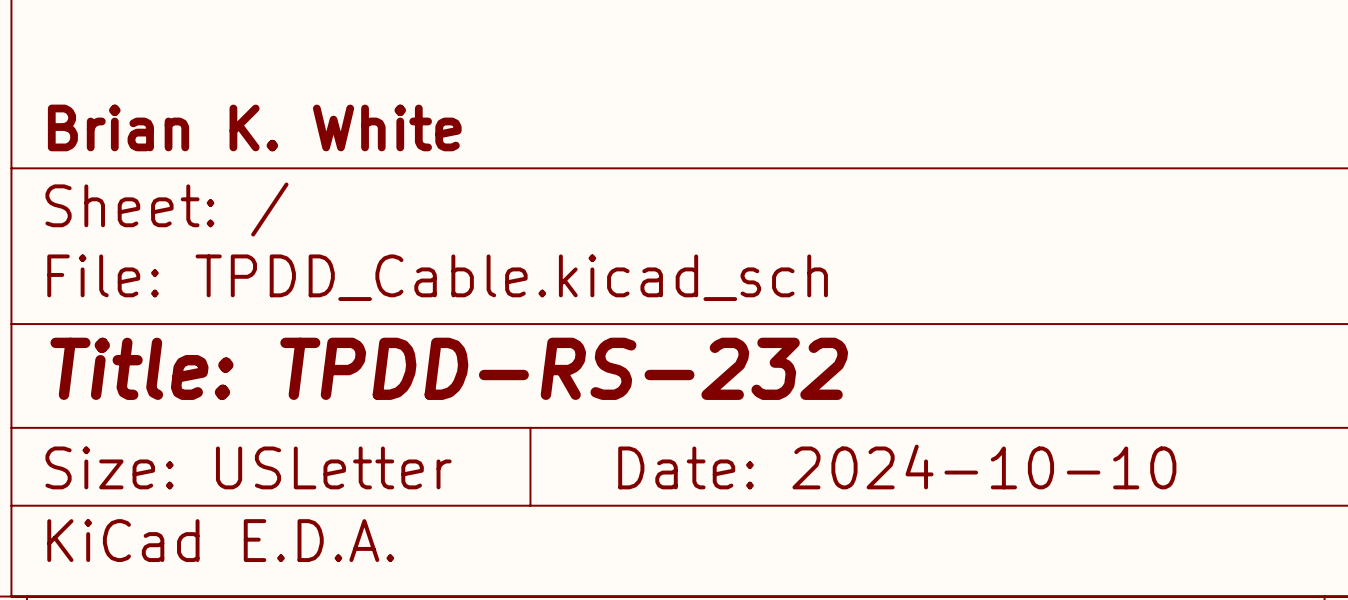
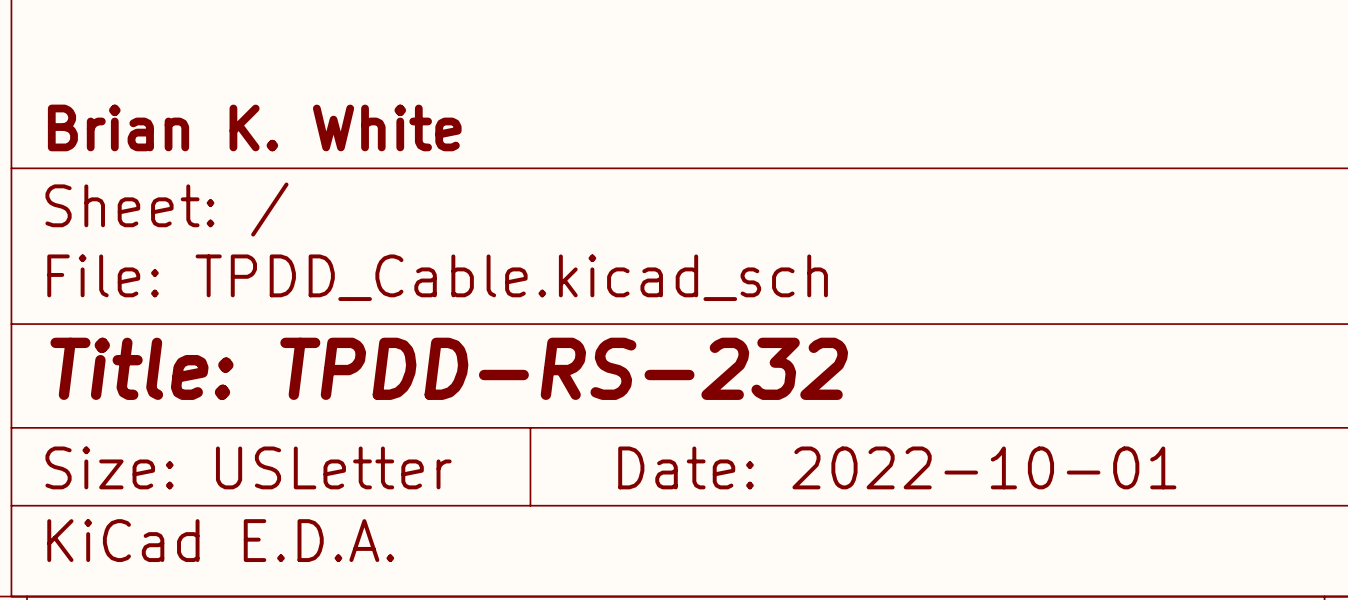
title block: Date: 2024-10-10 (897, 466) -> Date: 2022-10-01 (897, 467)

